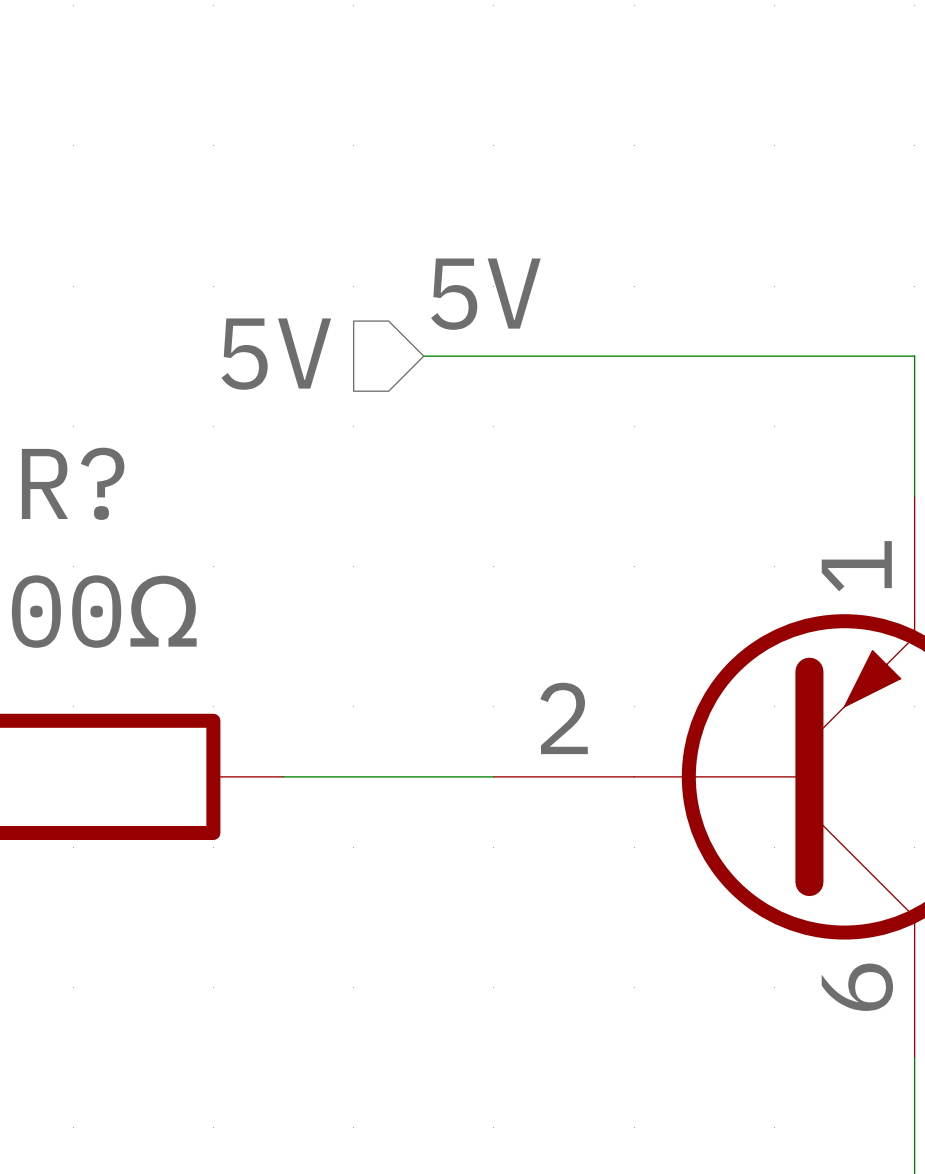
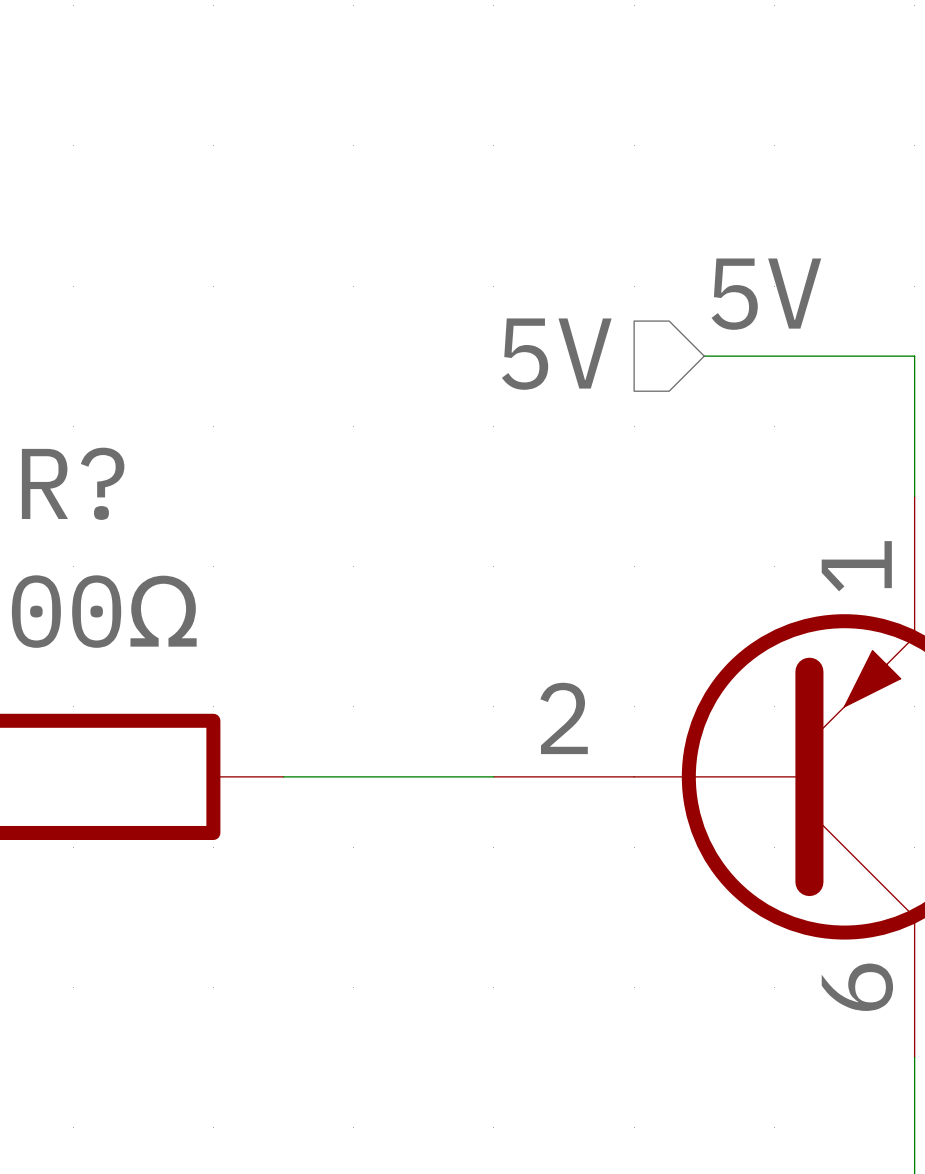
label position: 5V (485, 294) -> 5V (766, 294)
hierarchical label position: 5V (276, 354) -> 5V (556, 354)
wire: (423, 356) (704, 356) -> none

